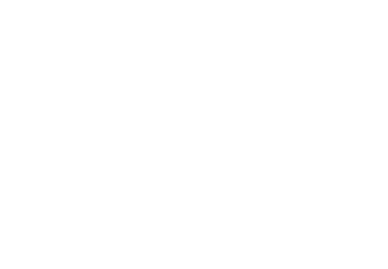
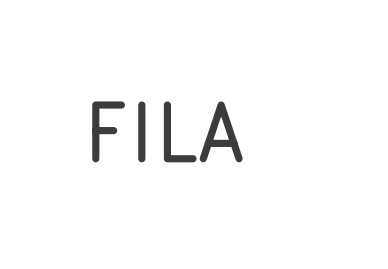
text: none -> FILA (167, 131)

